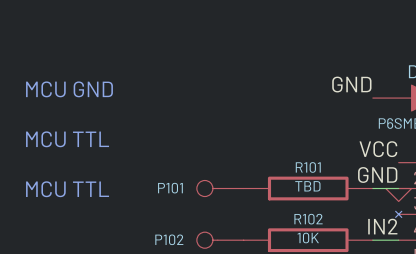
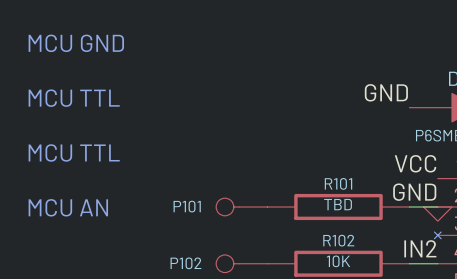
text: none -> MCU GND (76, 43)
text: MCU GND (69, 89) -> MCU TTL (74, 98)
text: MCU TTL (67, 189) -> MCU AN (68, 207)

